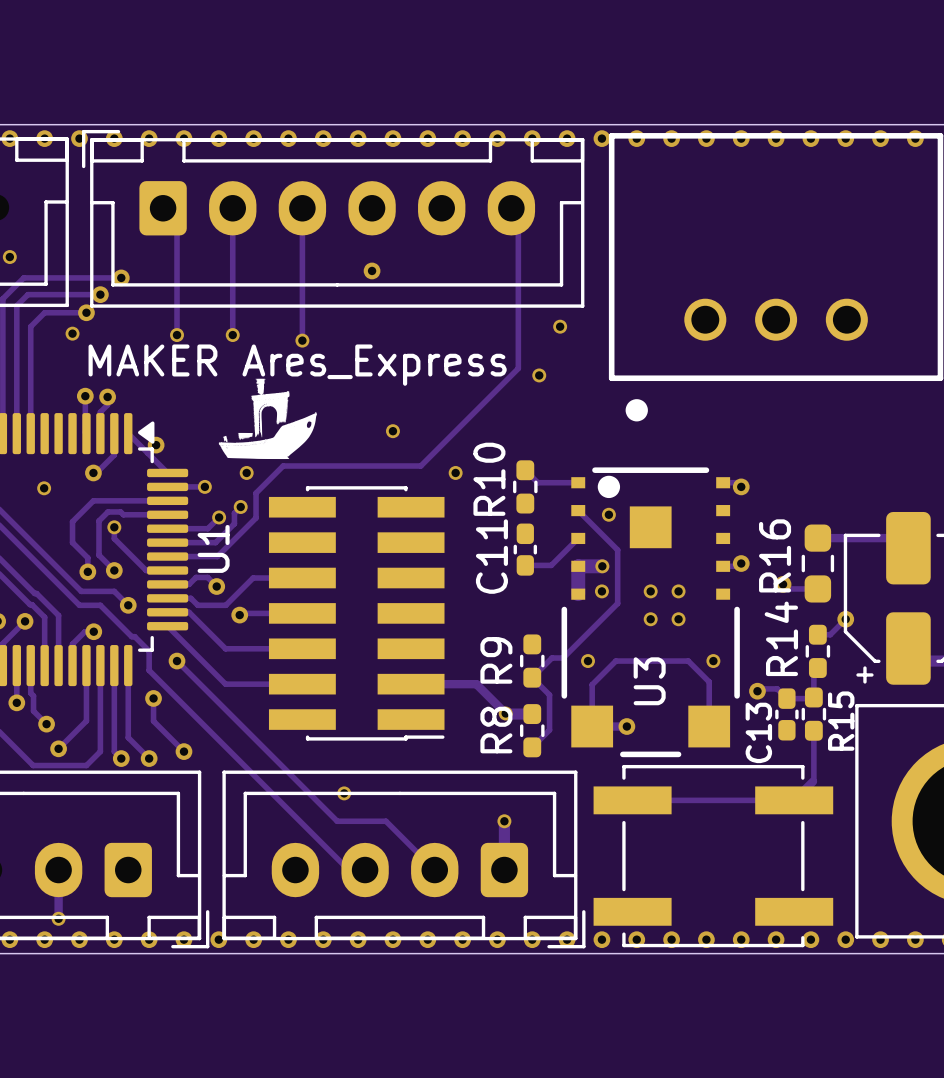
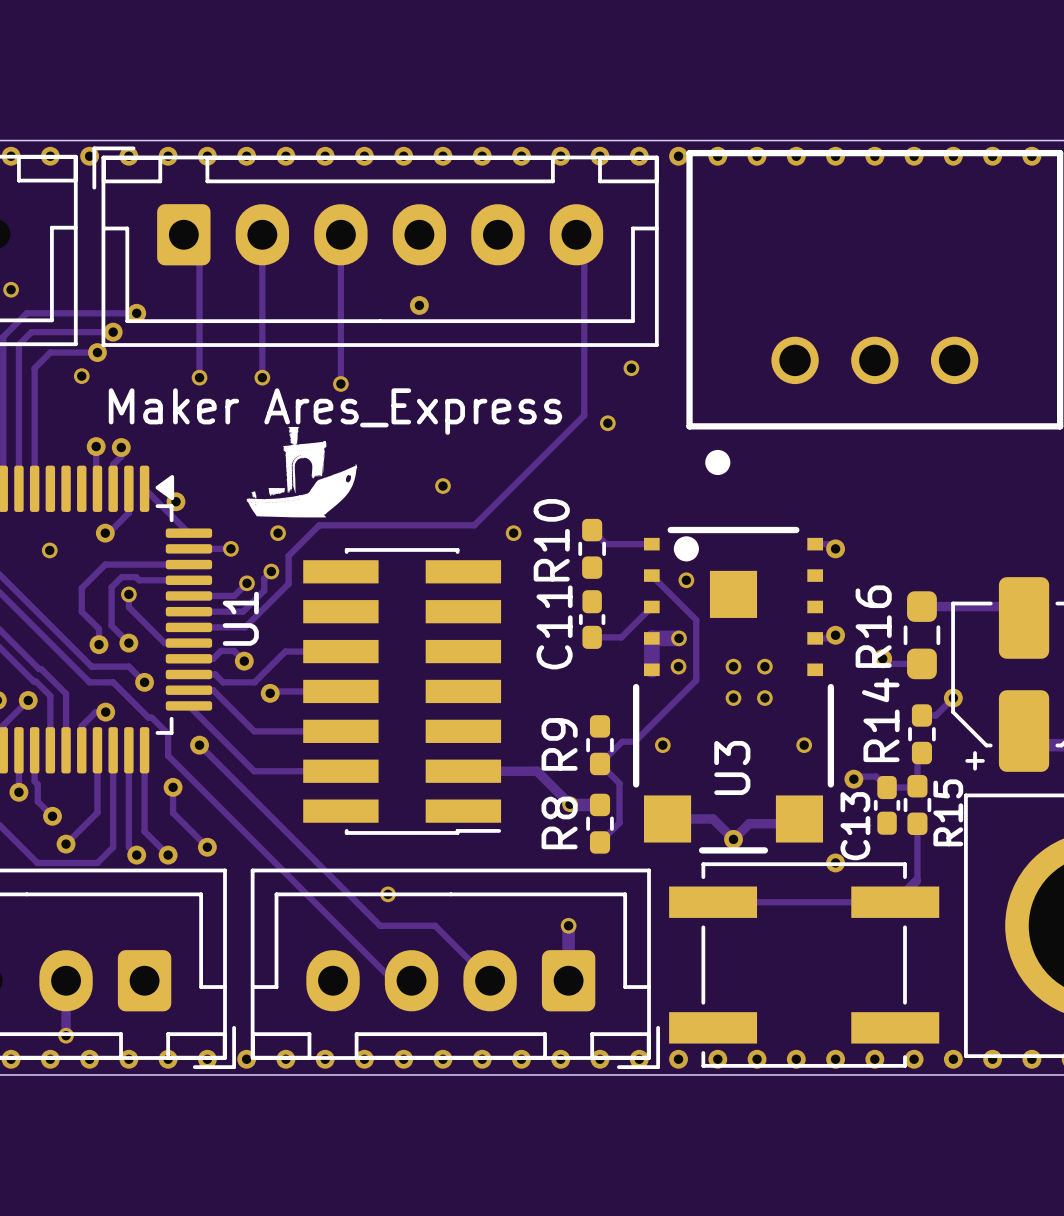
MAKER Ares_Express name: MAKER Ares_Express (297, 365) -> Maker Ares_Express (335, 411)
track: (592, 726) (592, 684) (615, 661) (688, 661) (709, 681) (709, 726) -> (706, 818) (713, 818) (733, 839) (749, 823) (794, 823) (799, 818)
via position: (626, 726) -> (733, 839)
via: none -> (835, 862)

